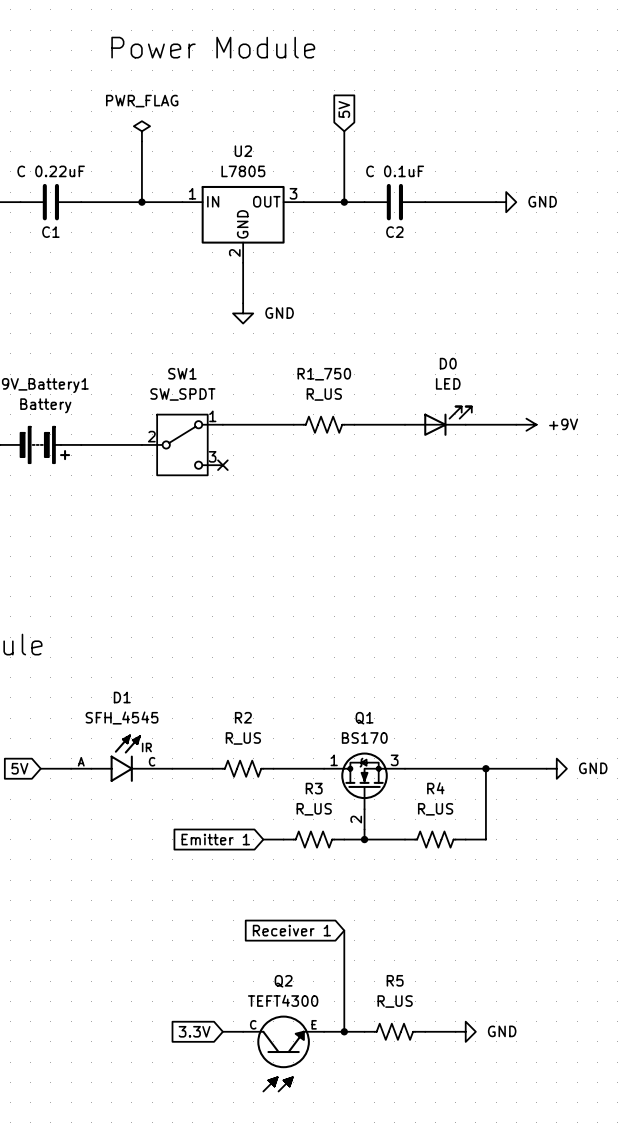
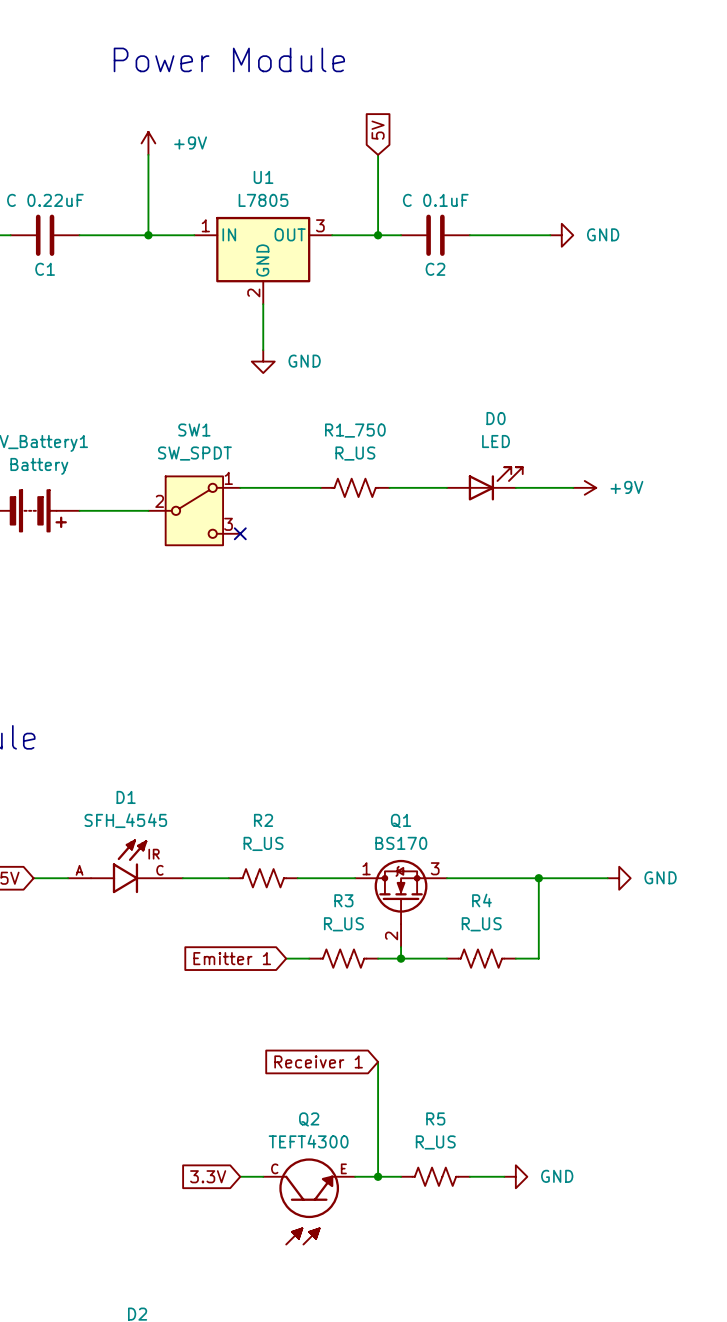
power symbol: none -> +9V (148, 143)
power symbol: PWR_FLAG (141, 131) -> none
U2 name: U2 (243, 151) -> U1 (263, 177)

